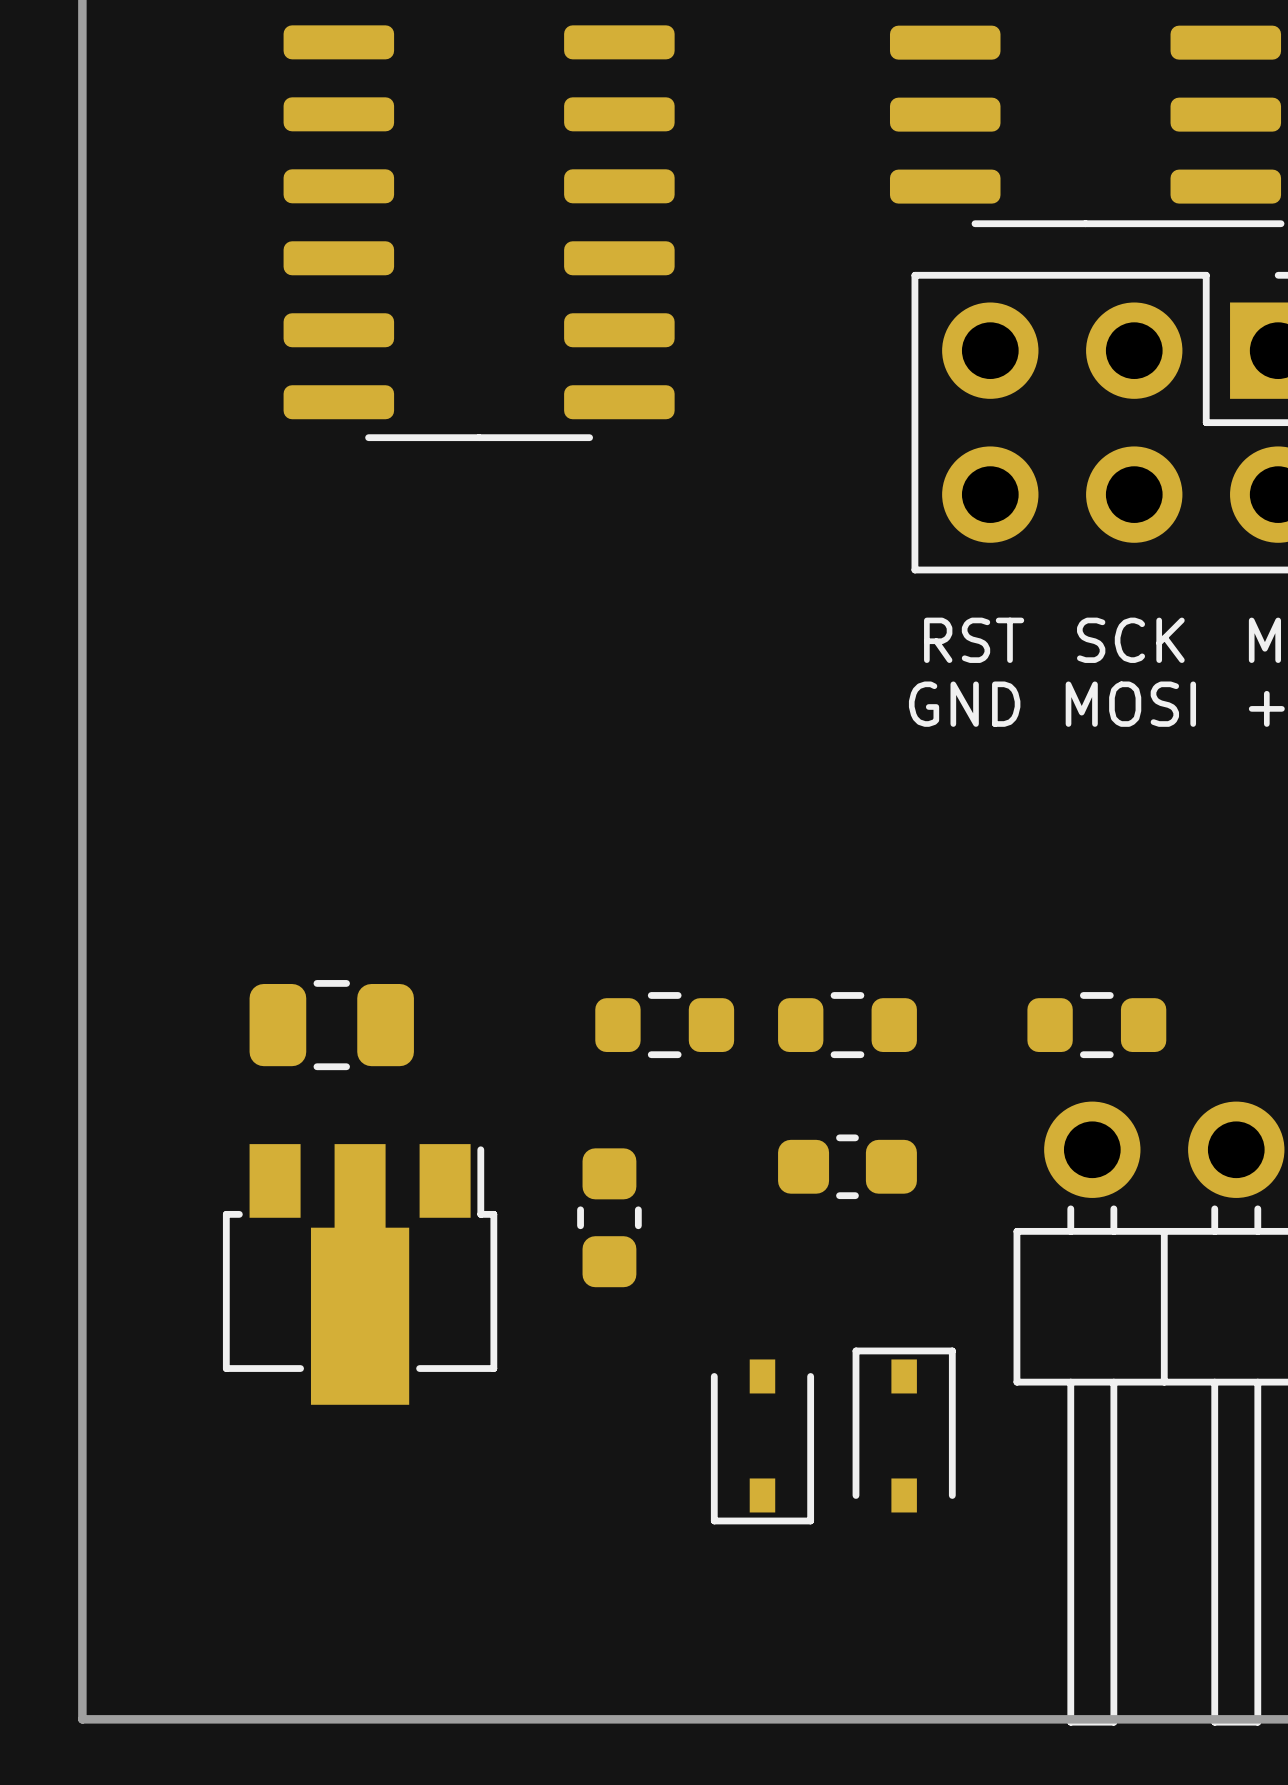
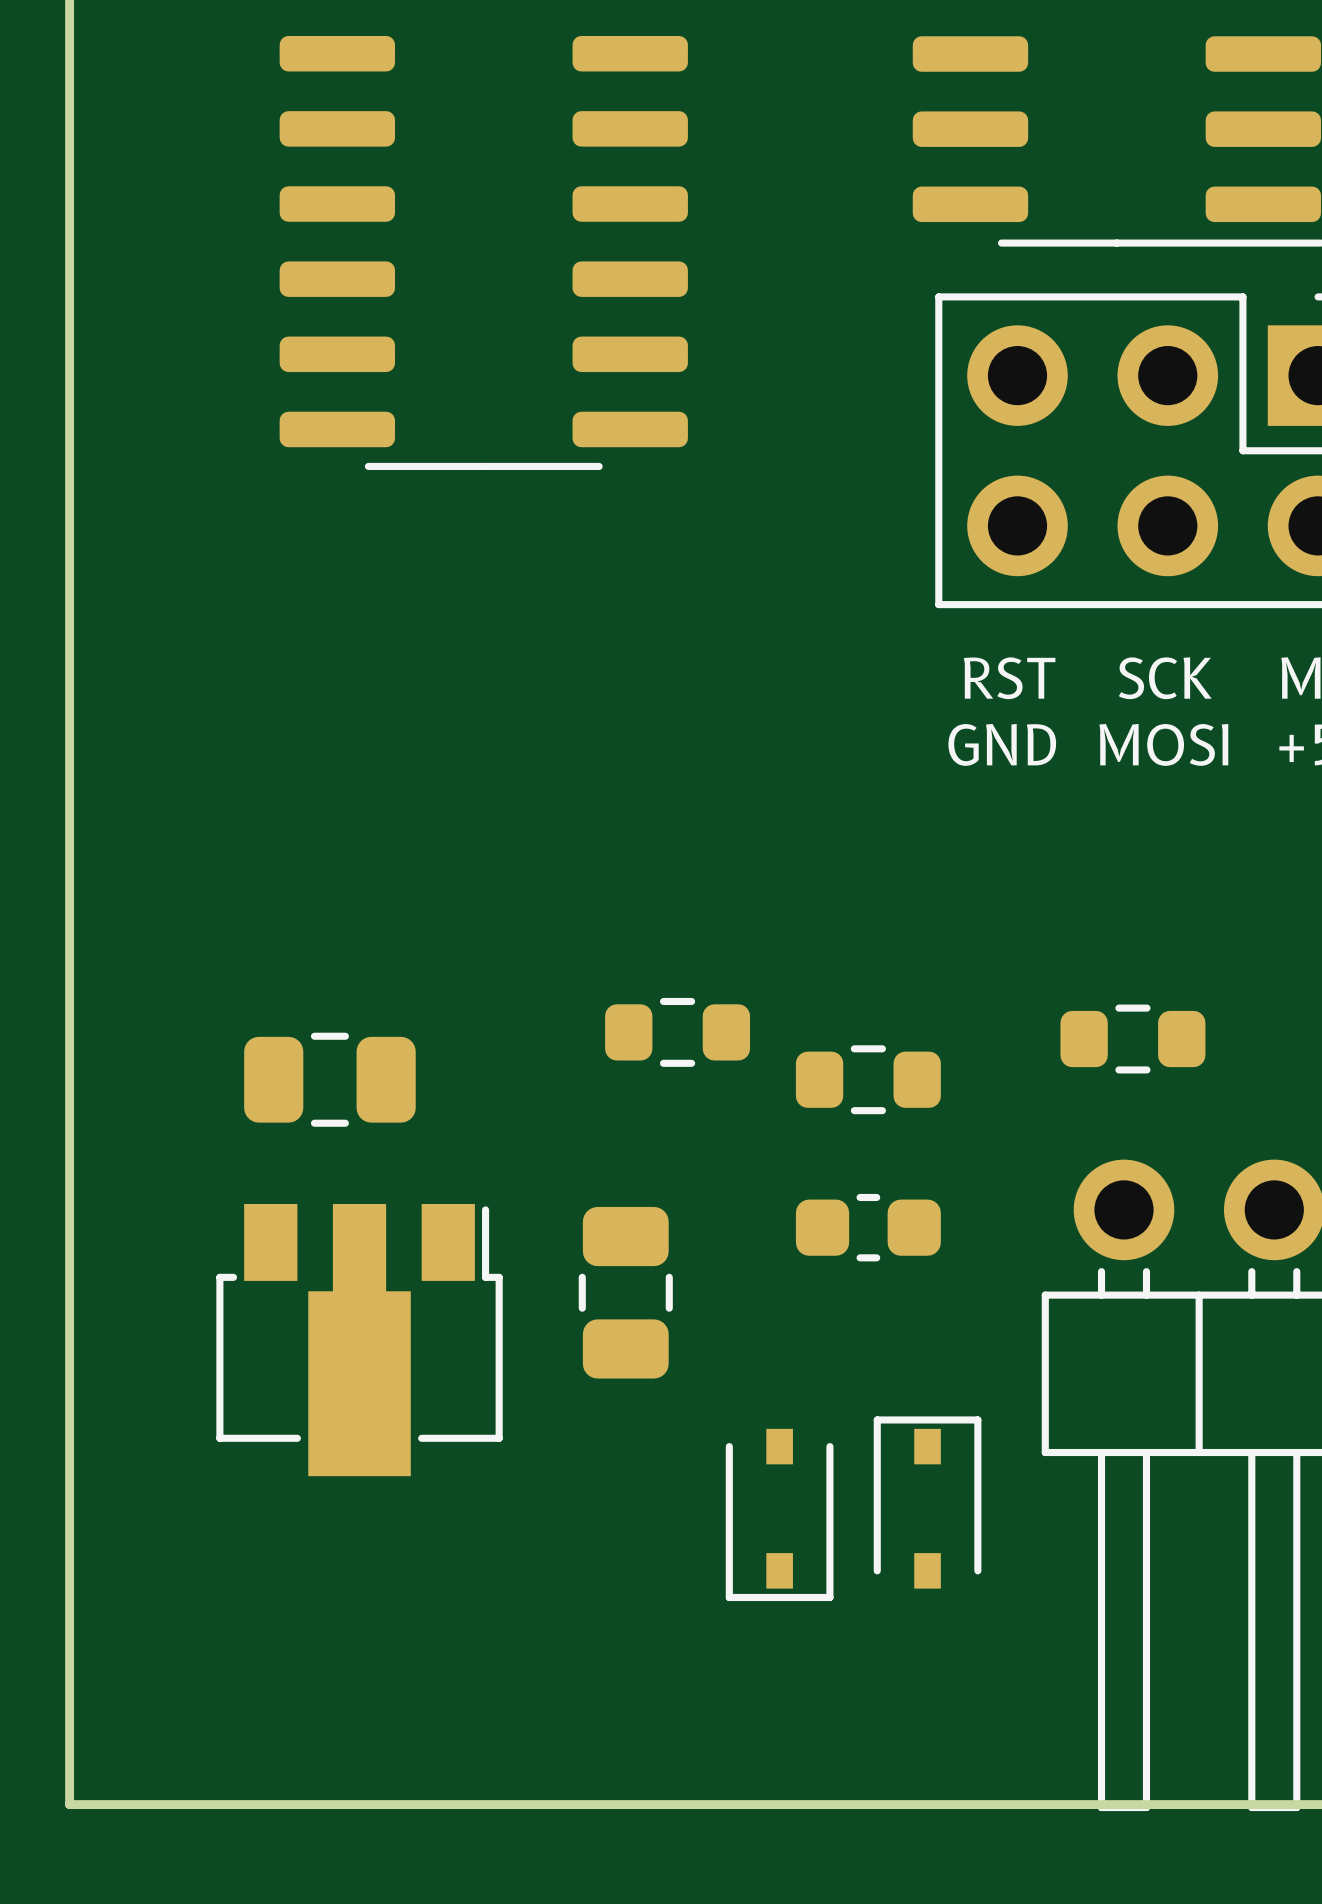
part position: (664, 1025) -> (677, 1032)
part position: (1096, 1025) -> (1132, 1039)
part footprint: [577, 1148, 642, 1288] -> [578, 1206, 673, 1379]

